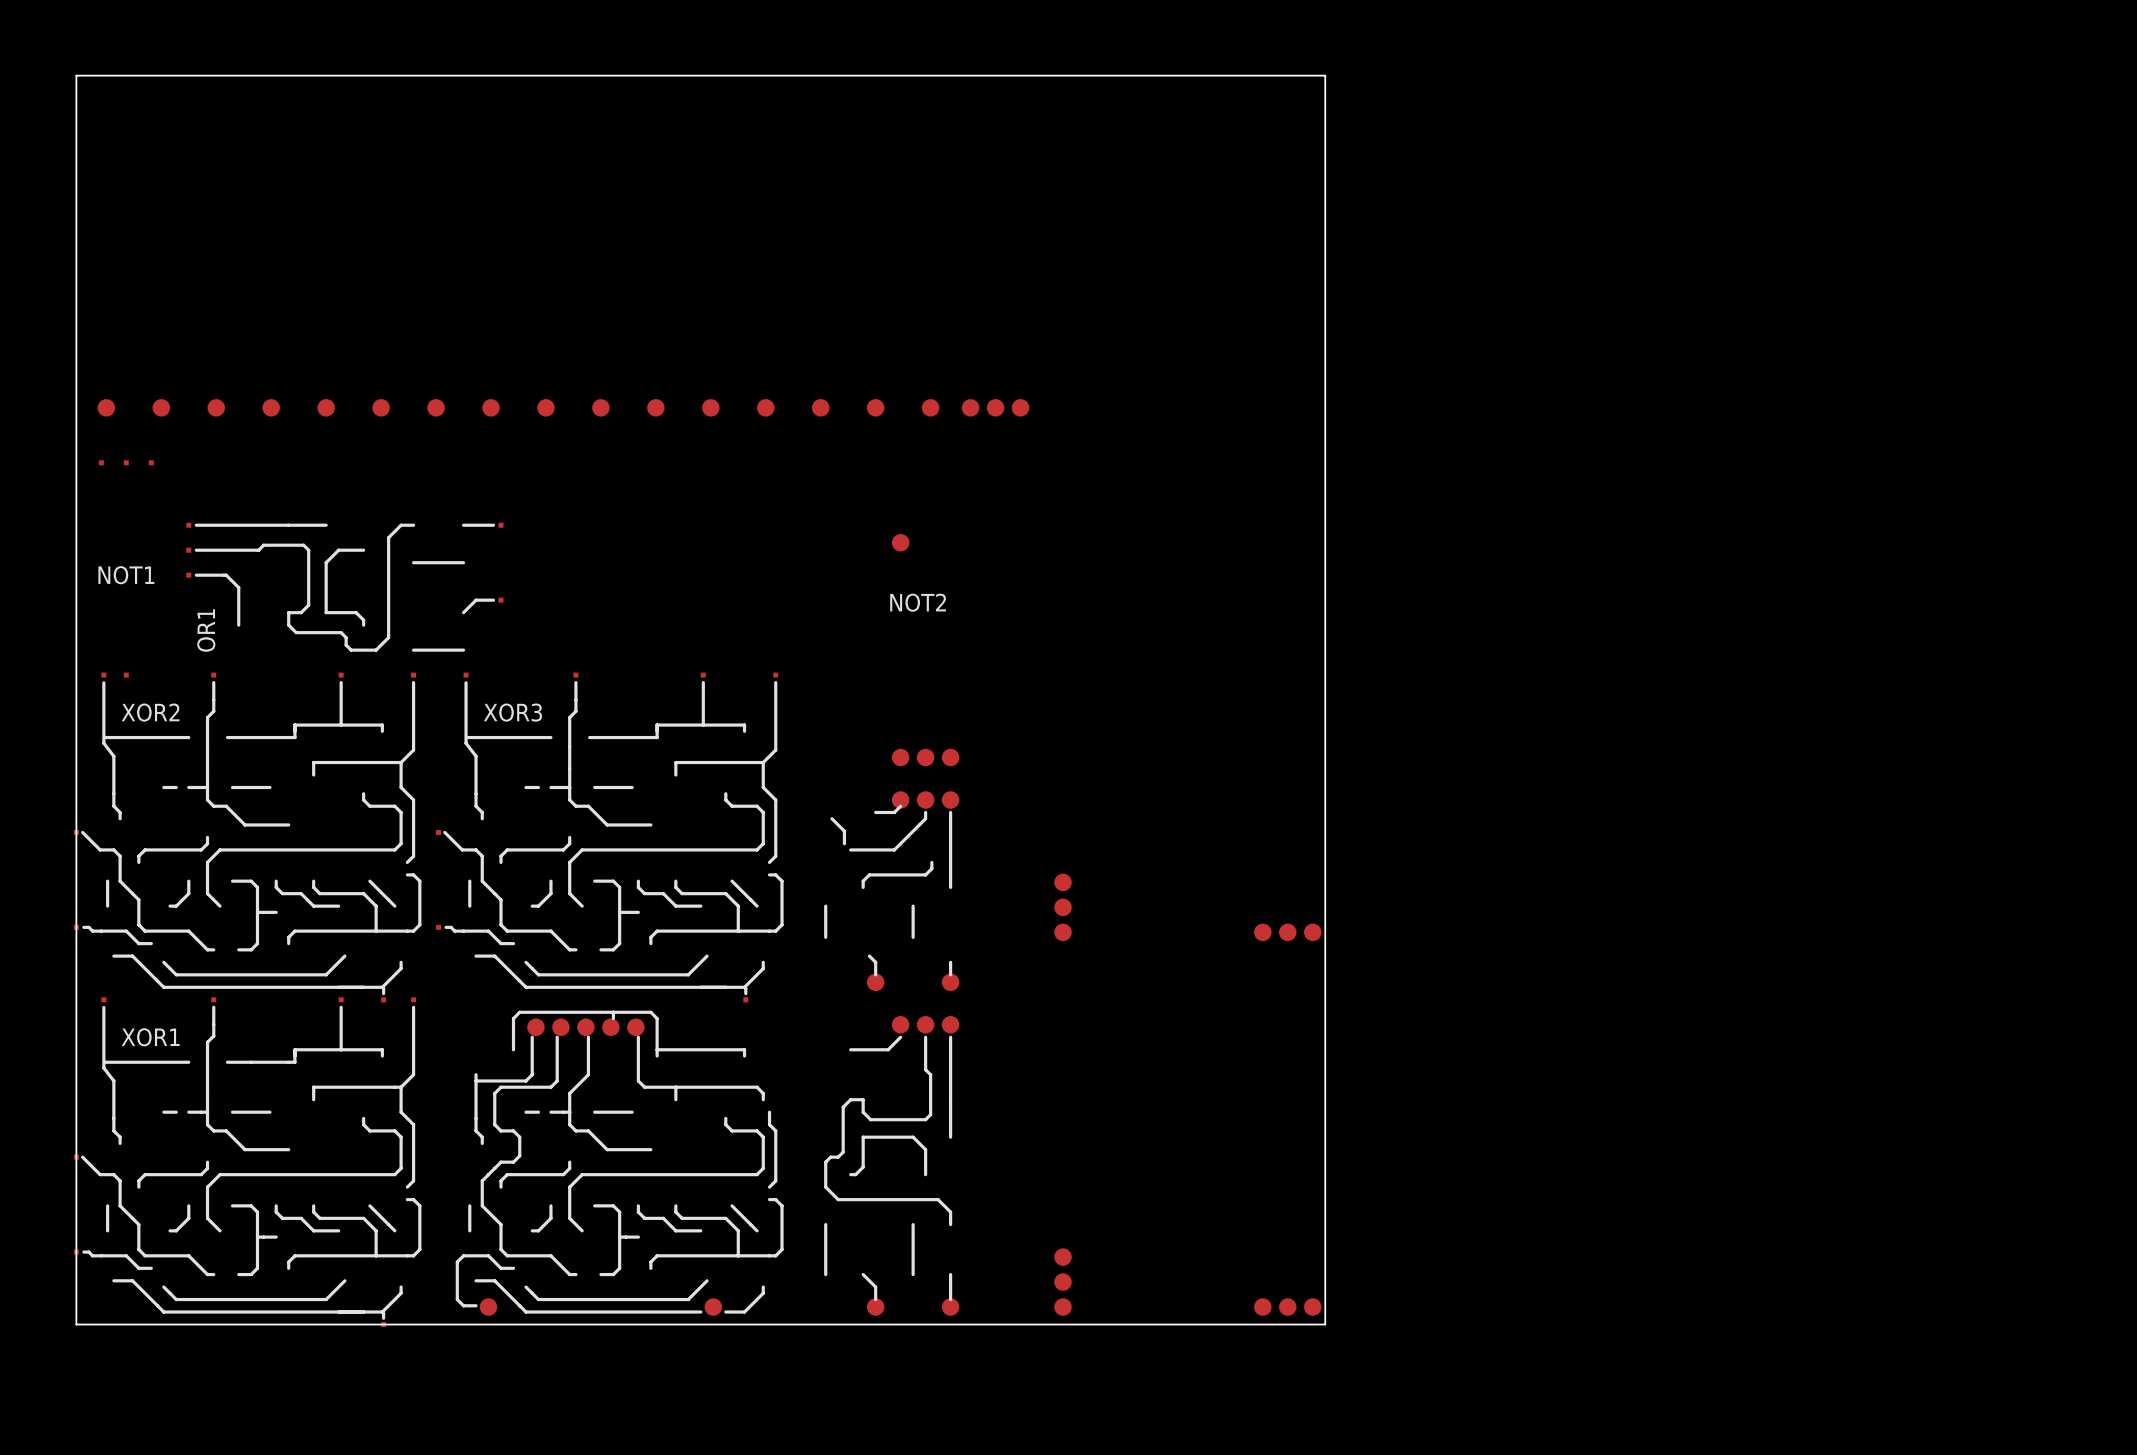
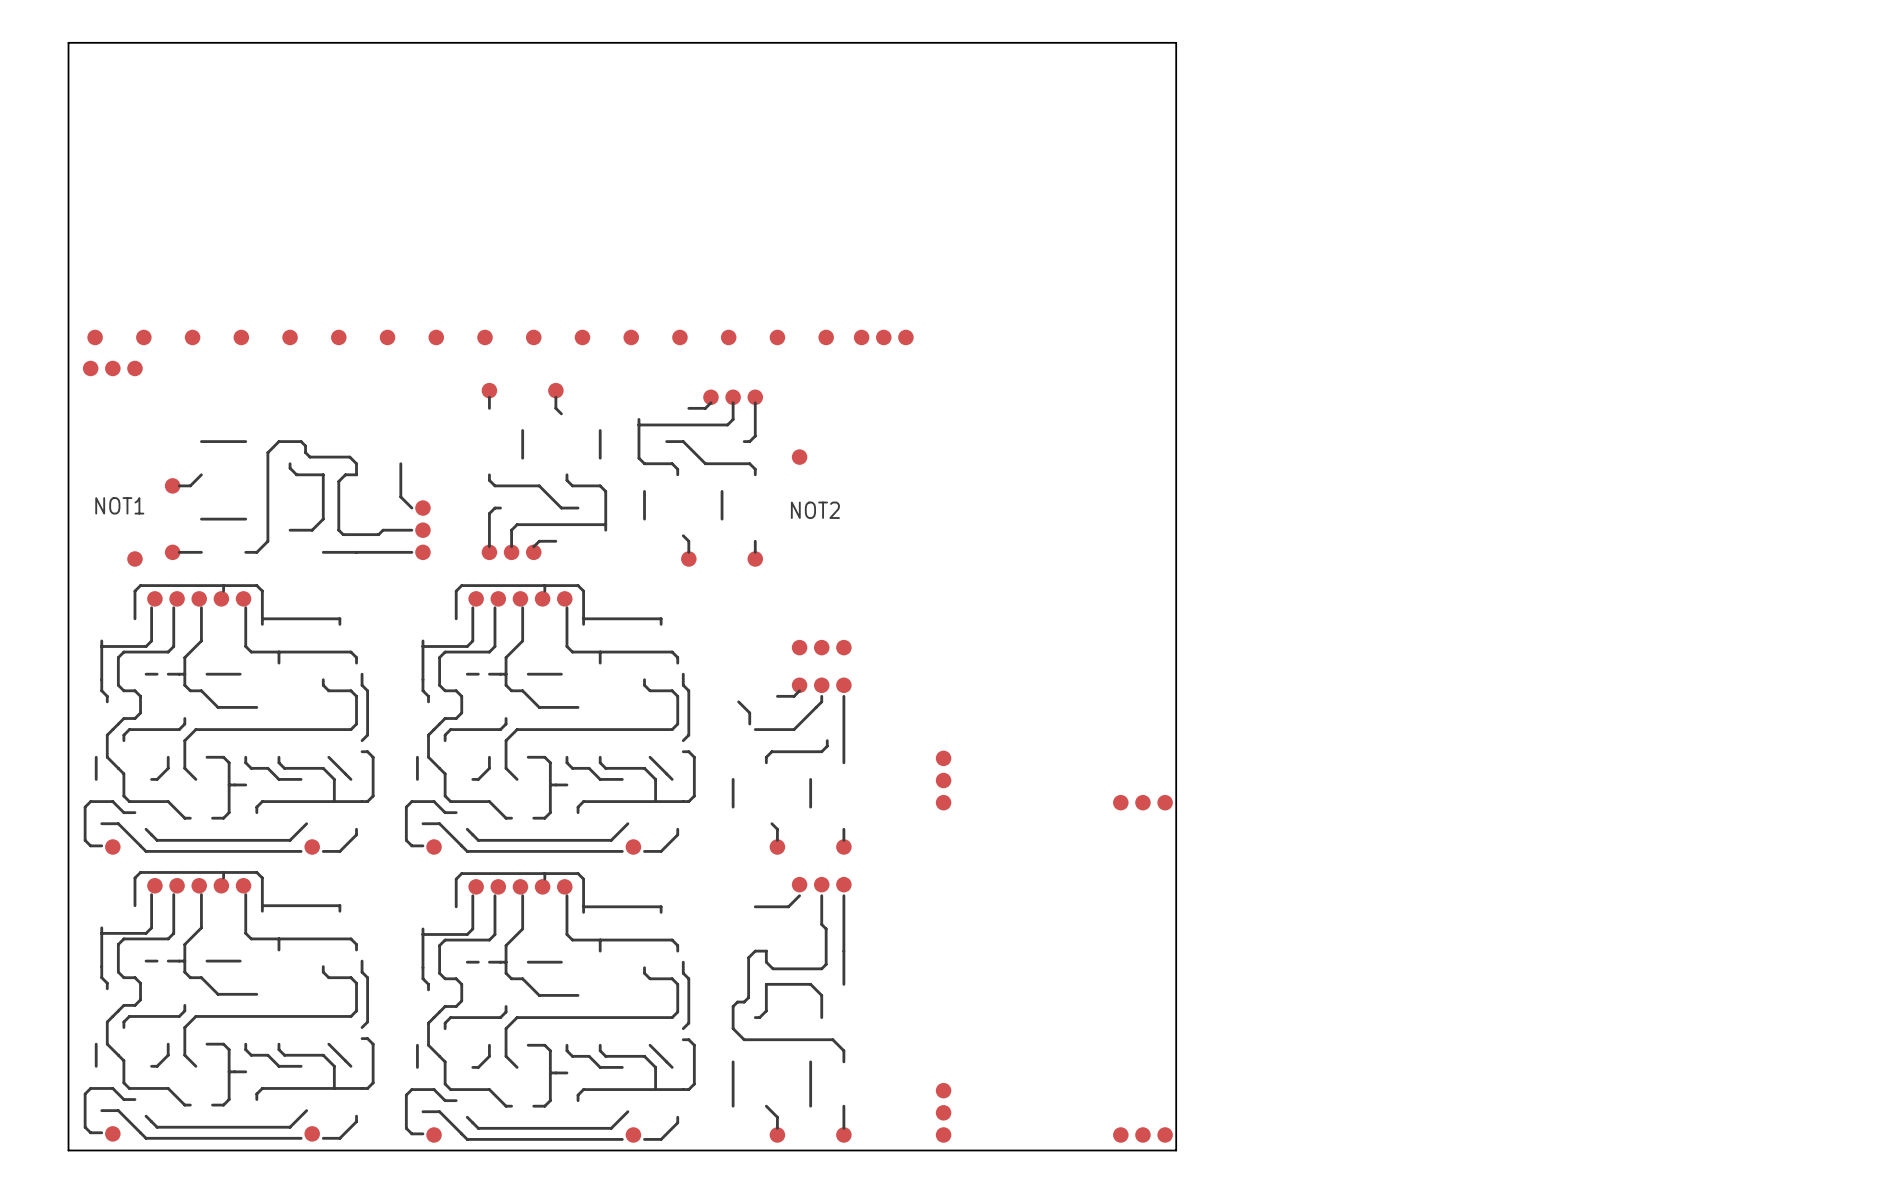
NOT1 footprint: [98, 460, 154, 678] -> [82, 360, 143, 567]
part: none -> (544, 471)
part: none -> (700, 478)
OR1: (344, 587) -> none
part: none -> (297, 500)
XOR2: (247, 837) -> none
XOR3: (609, 837) -> none
part: none -> (229, 719)
part: none -> (550, 719)
part: none -> (229, 1006)
XOR1: (247, 1162) -> none

